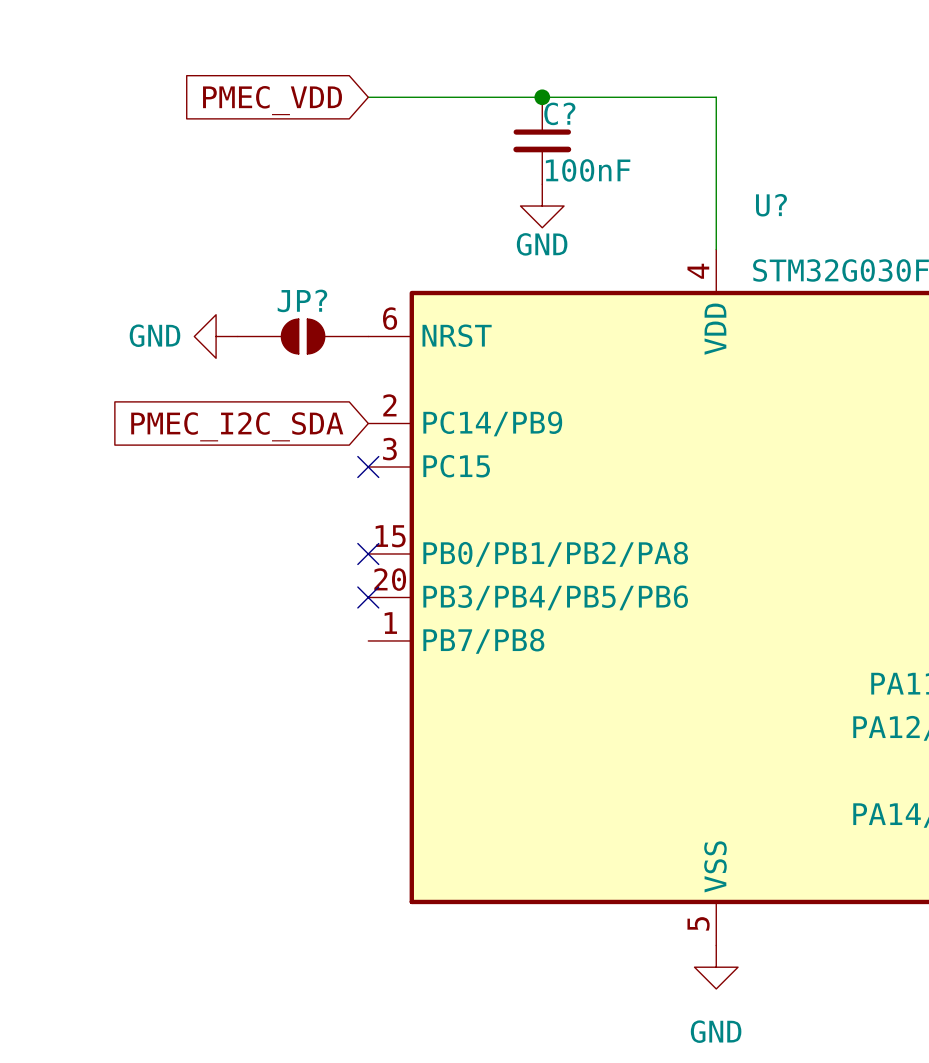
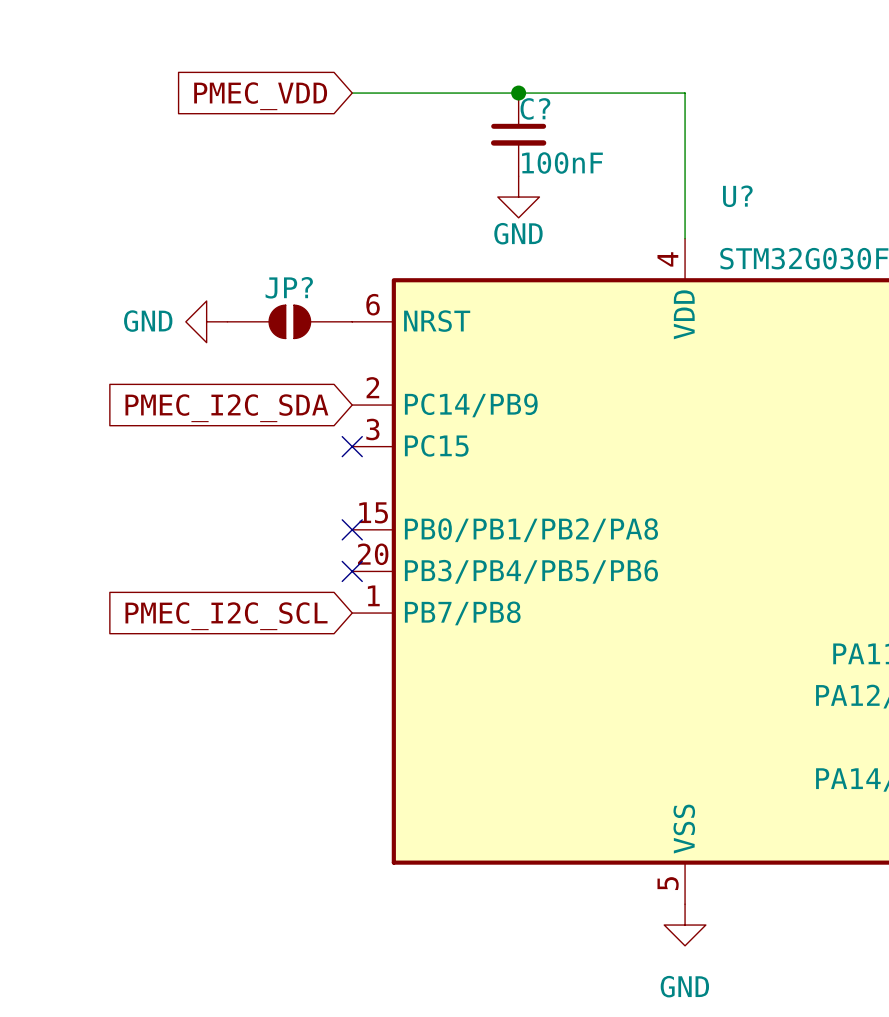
global label: none -> PMEC_I2C_SCL (226, 616)

